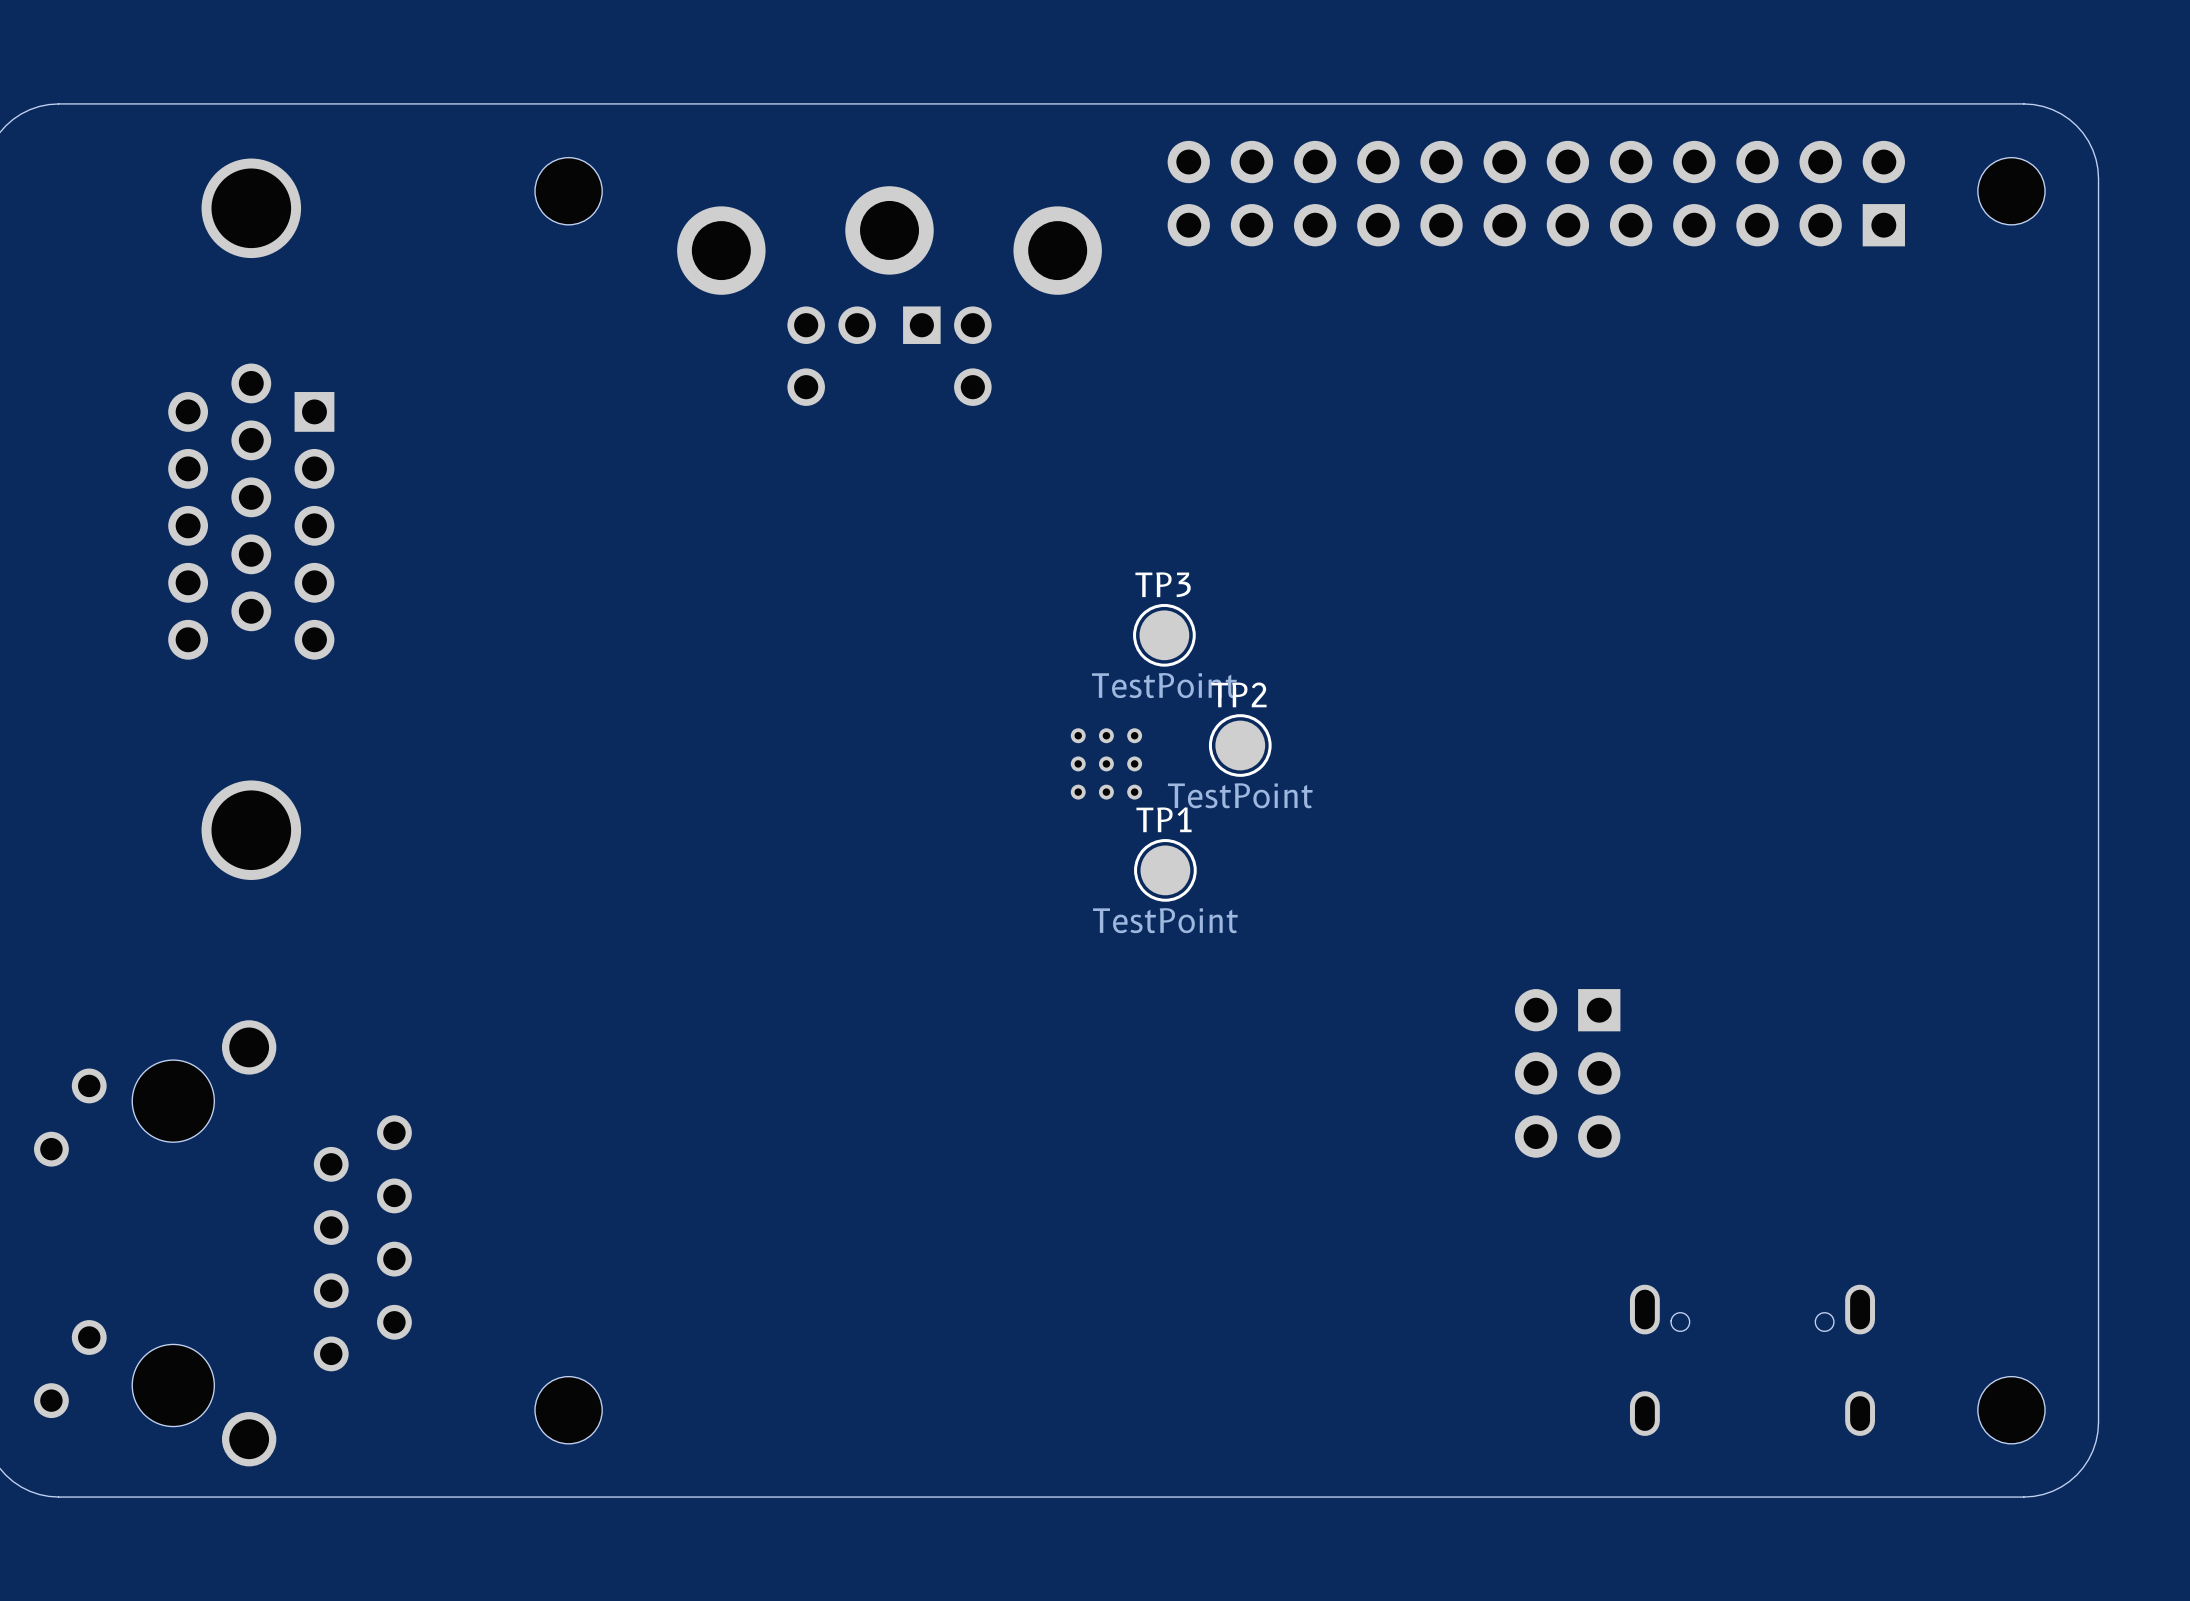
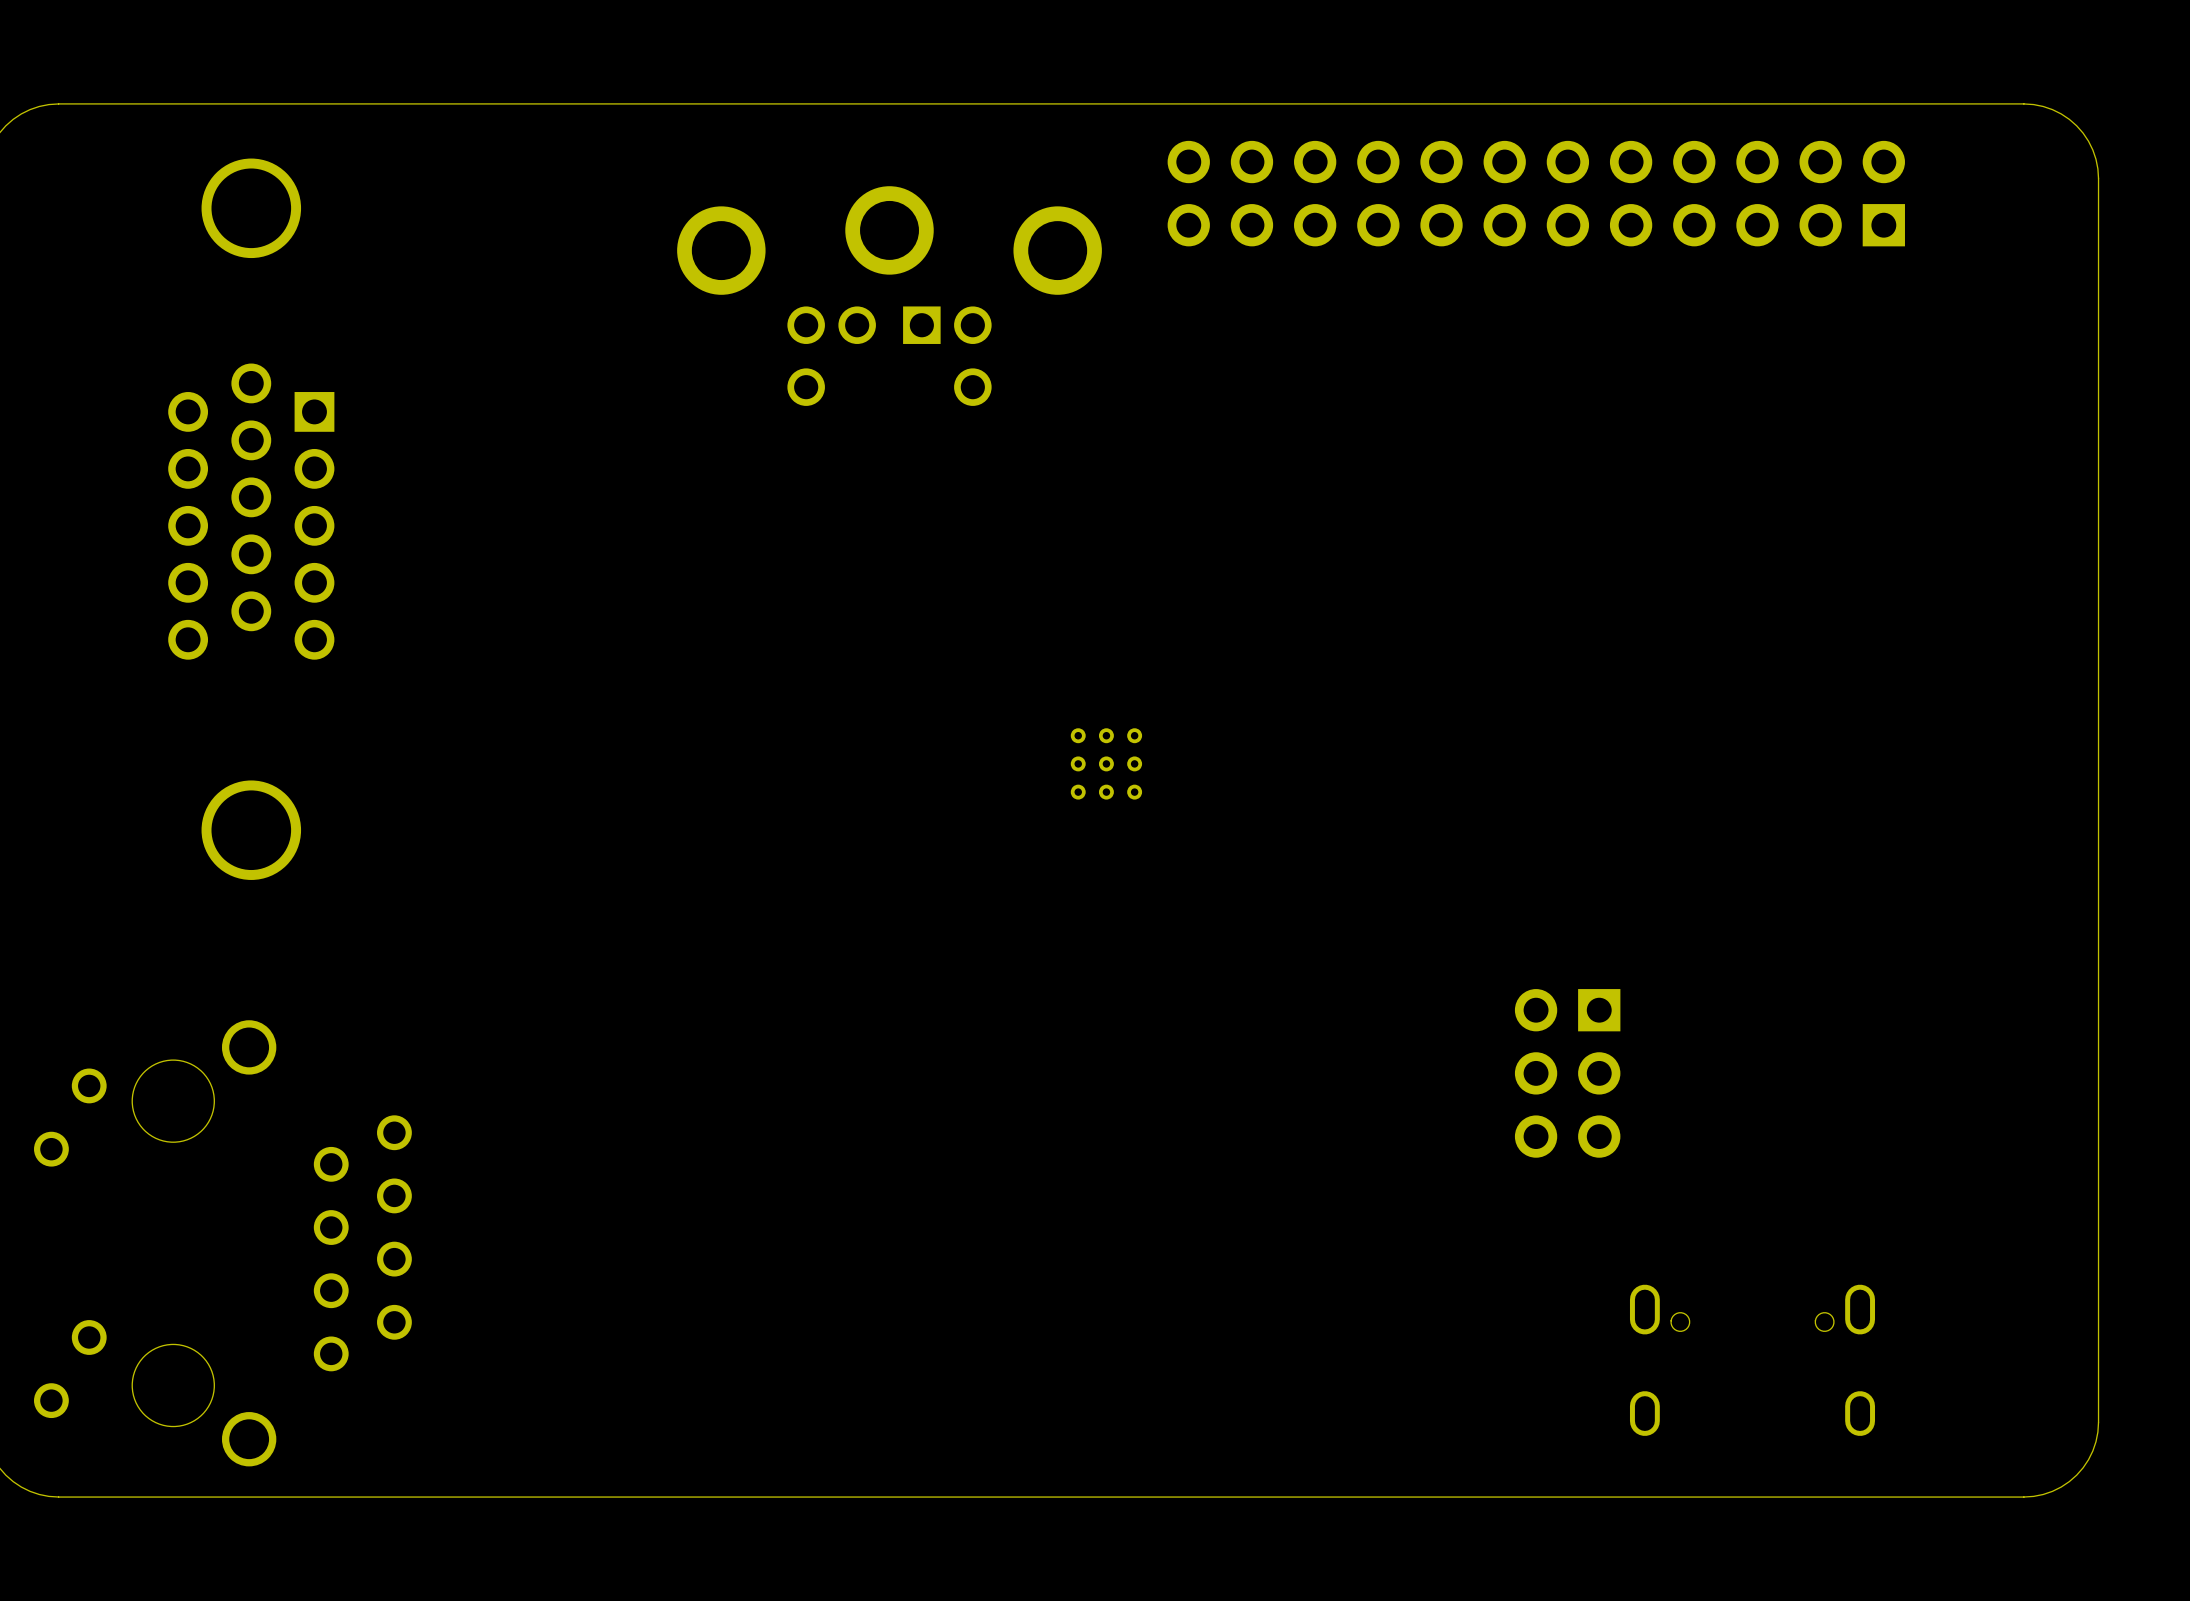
part: (568, 191) -> none
part: (2011, 191) -> none
TP3: TestPoint (1164, 635) -> none
TP2: TestPoint (1240, 745) -> none
TP1: TestPoint (1165, 870) -> none
part: (568, 1410) -> none
part: (2011, 1410) -> none

